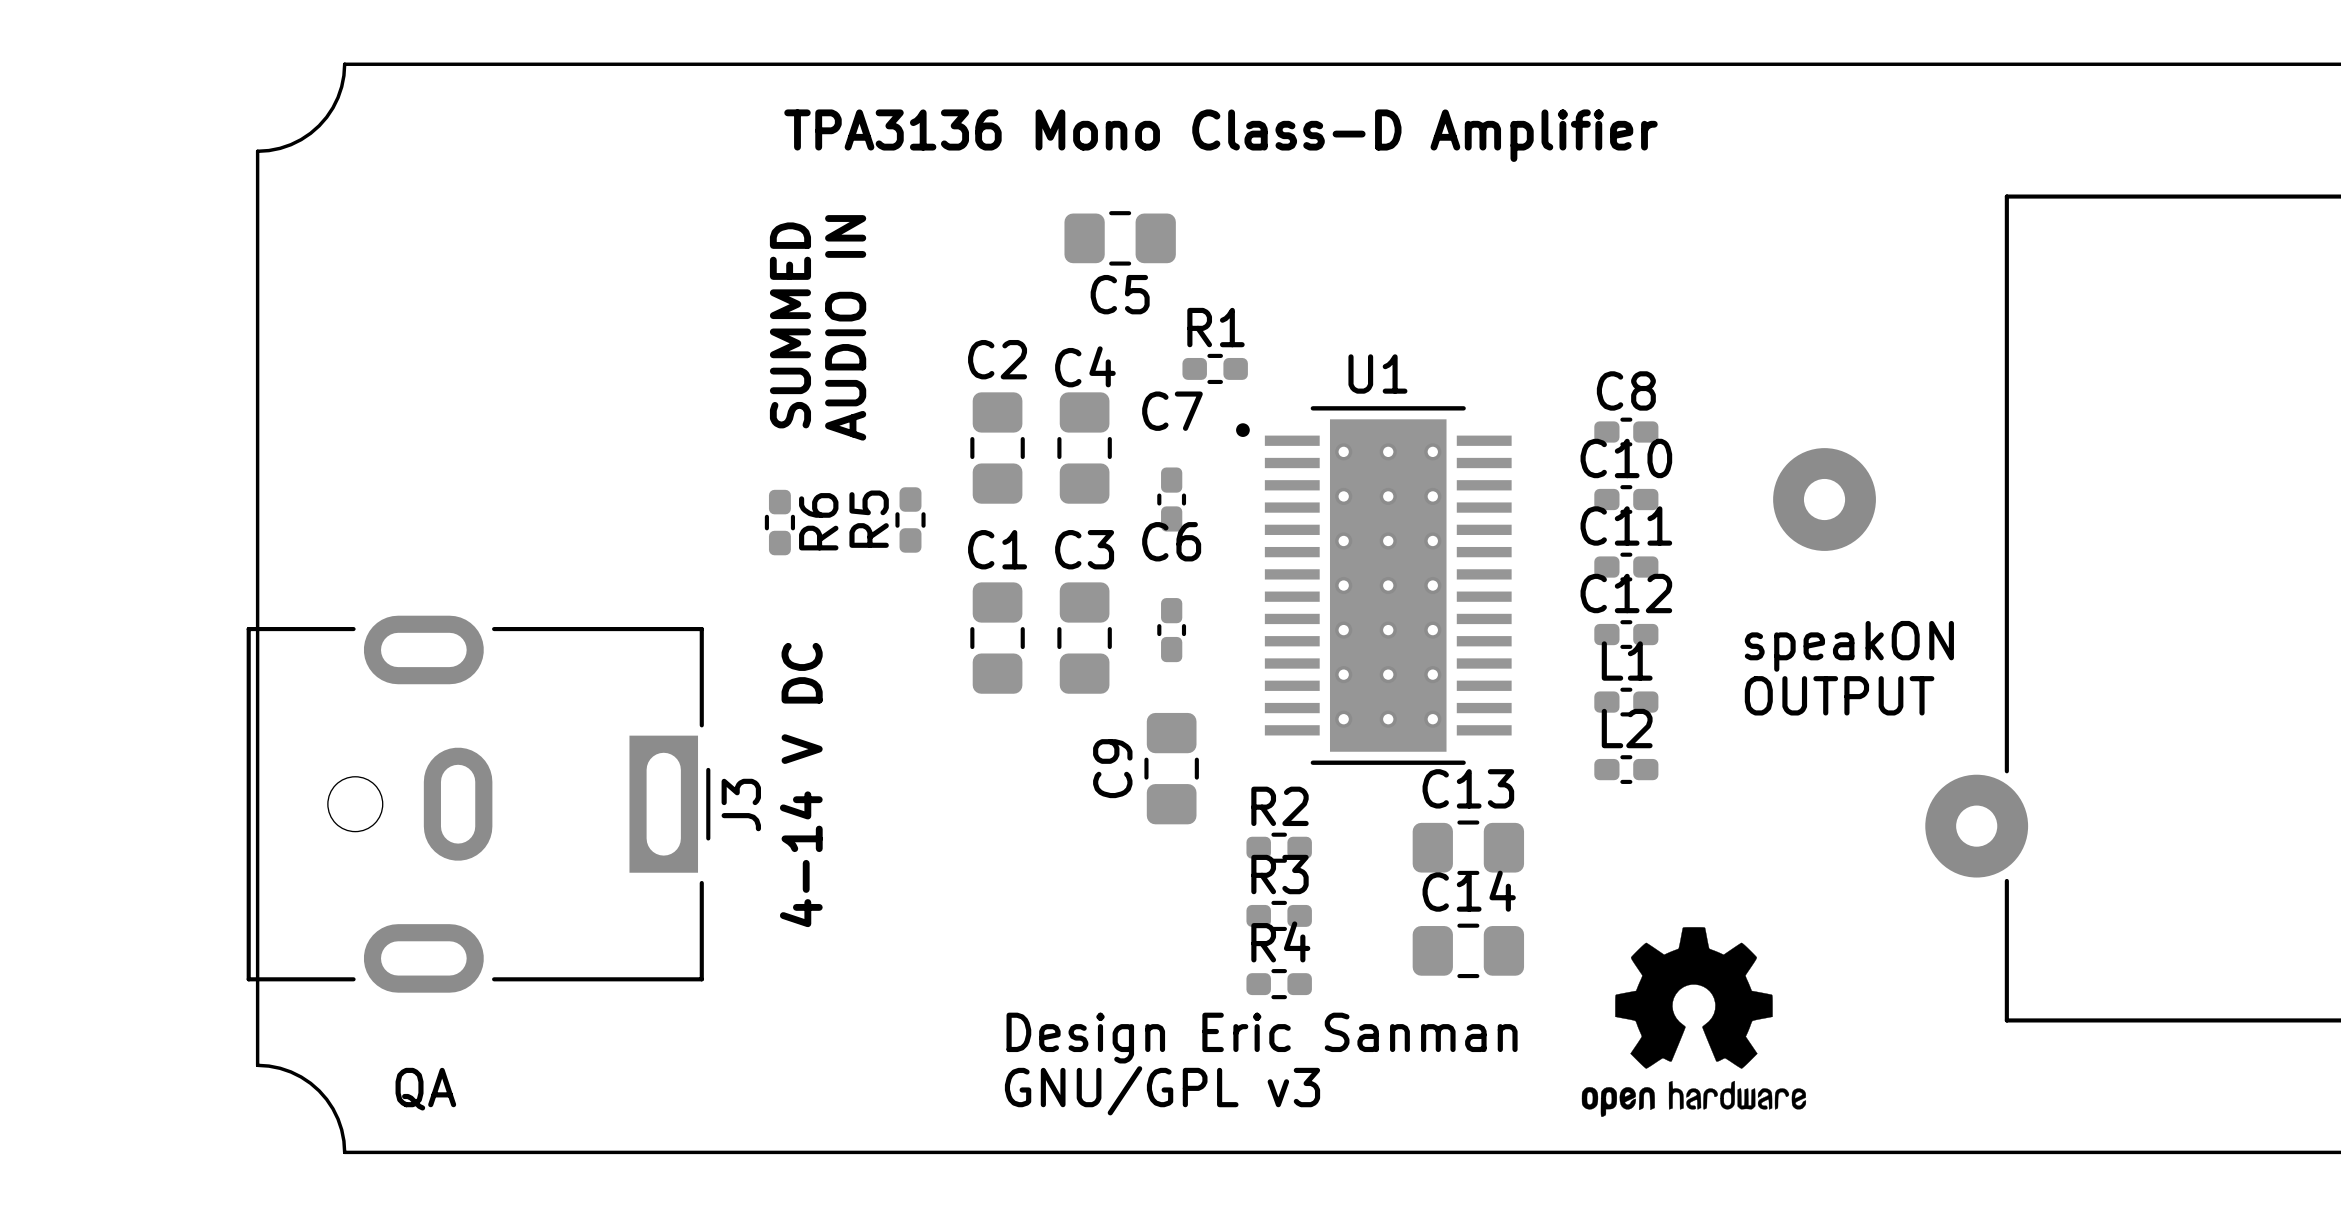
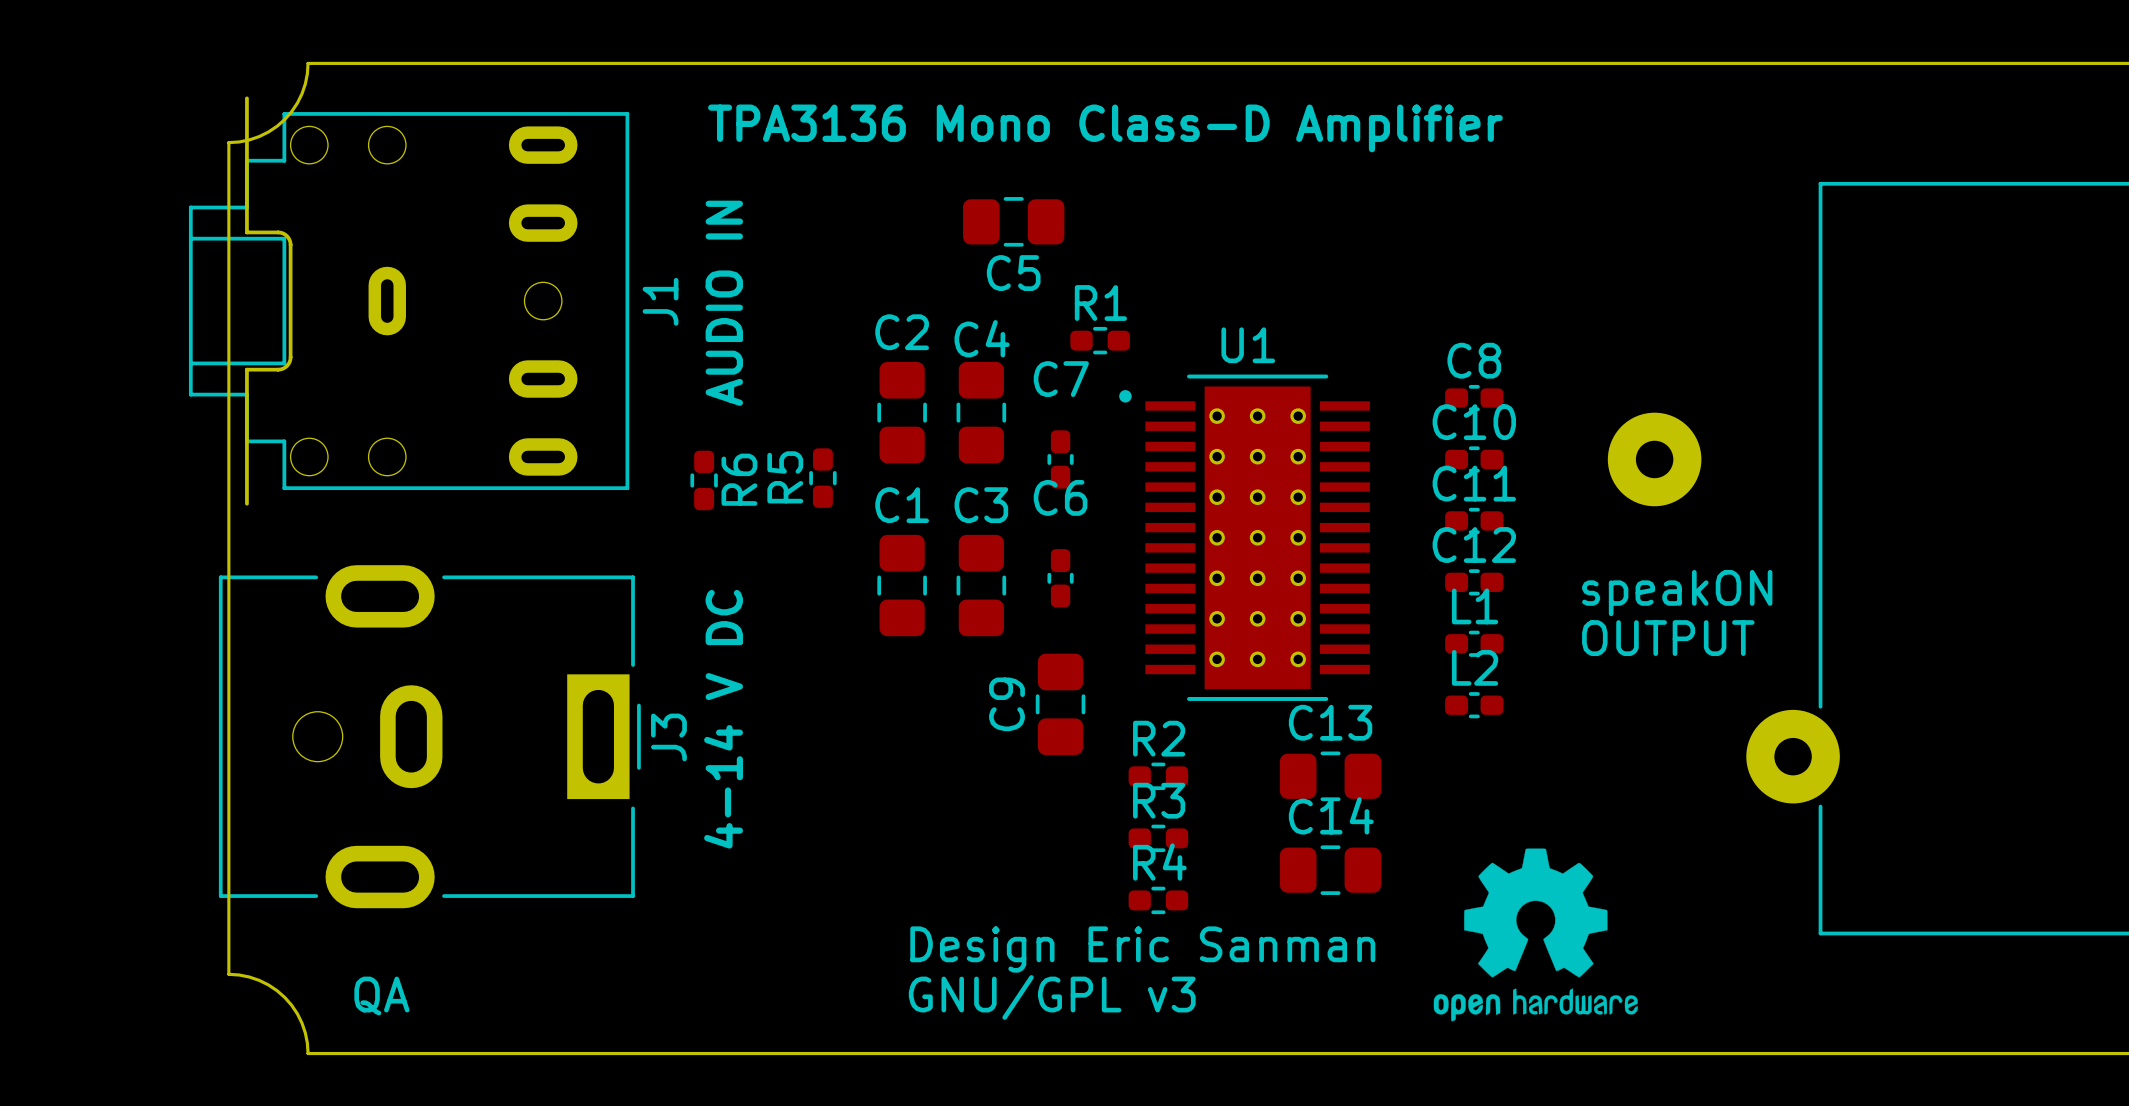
J1: none -> (409, 301)
text: SUMMED (790, 325) -> AUDIO IN (724, 303)
text: AUDIO IN (845, 327) -> none

